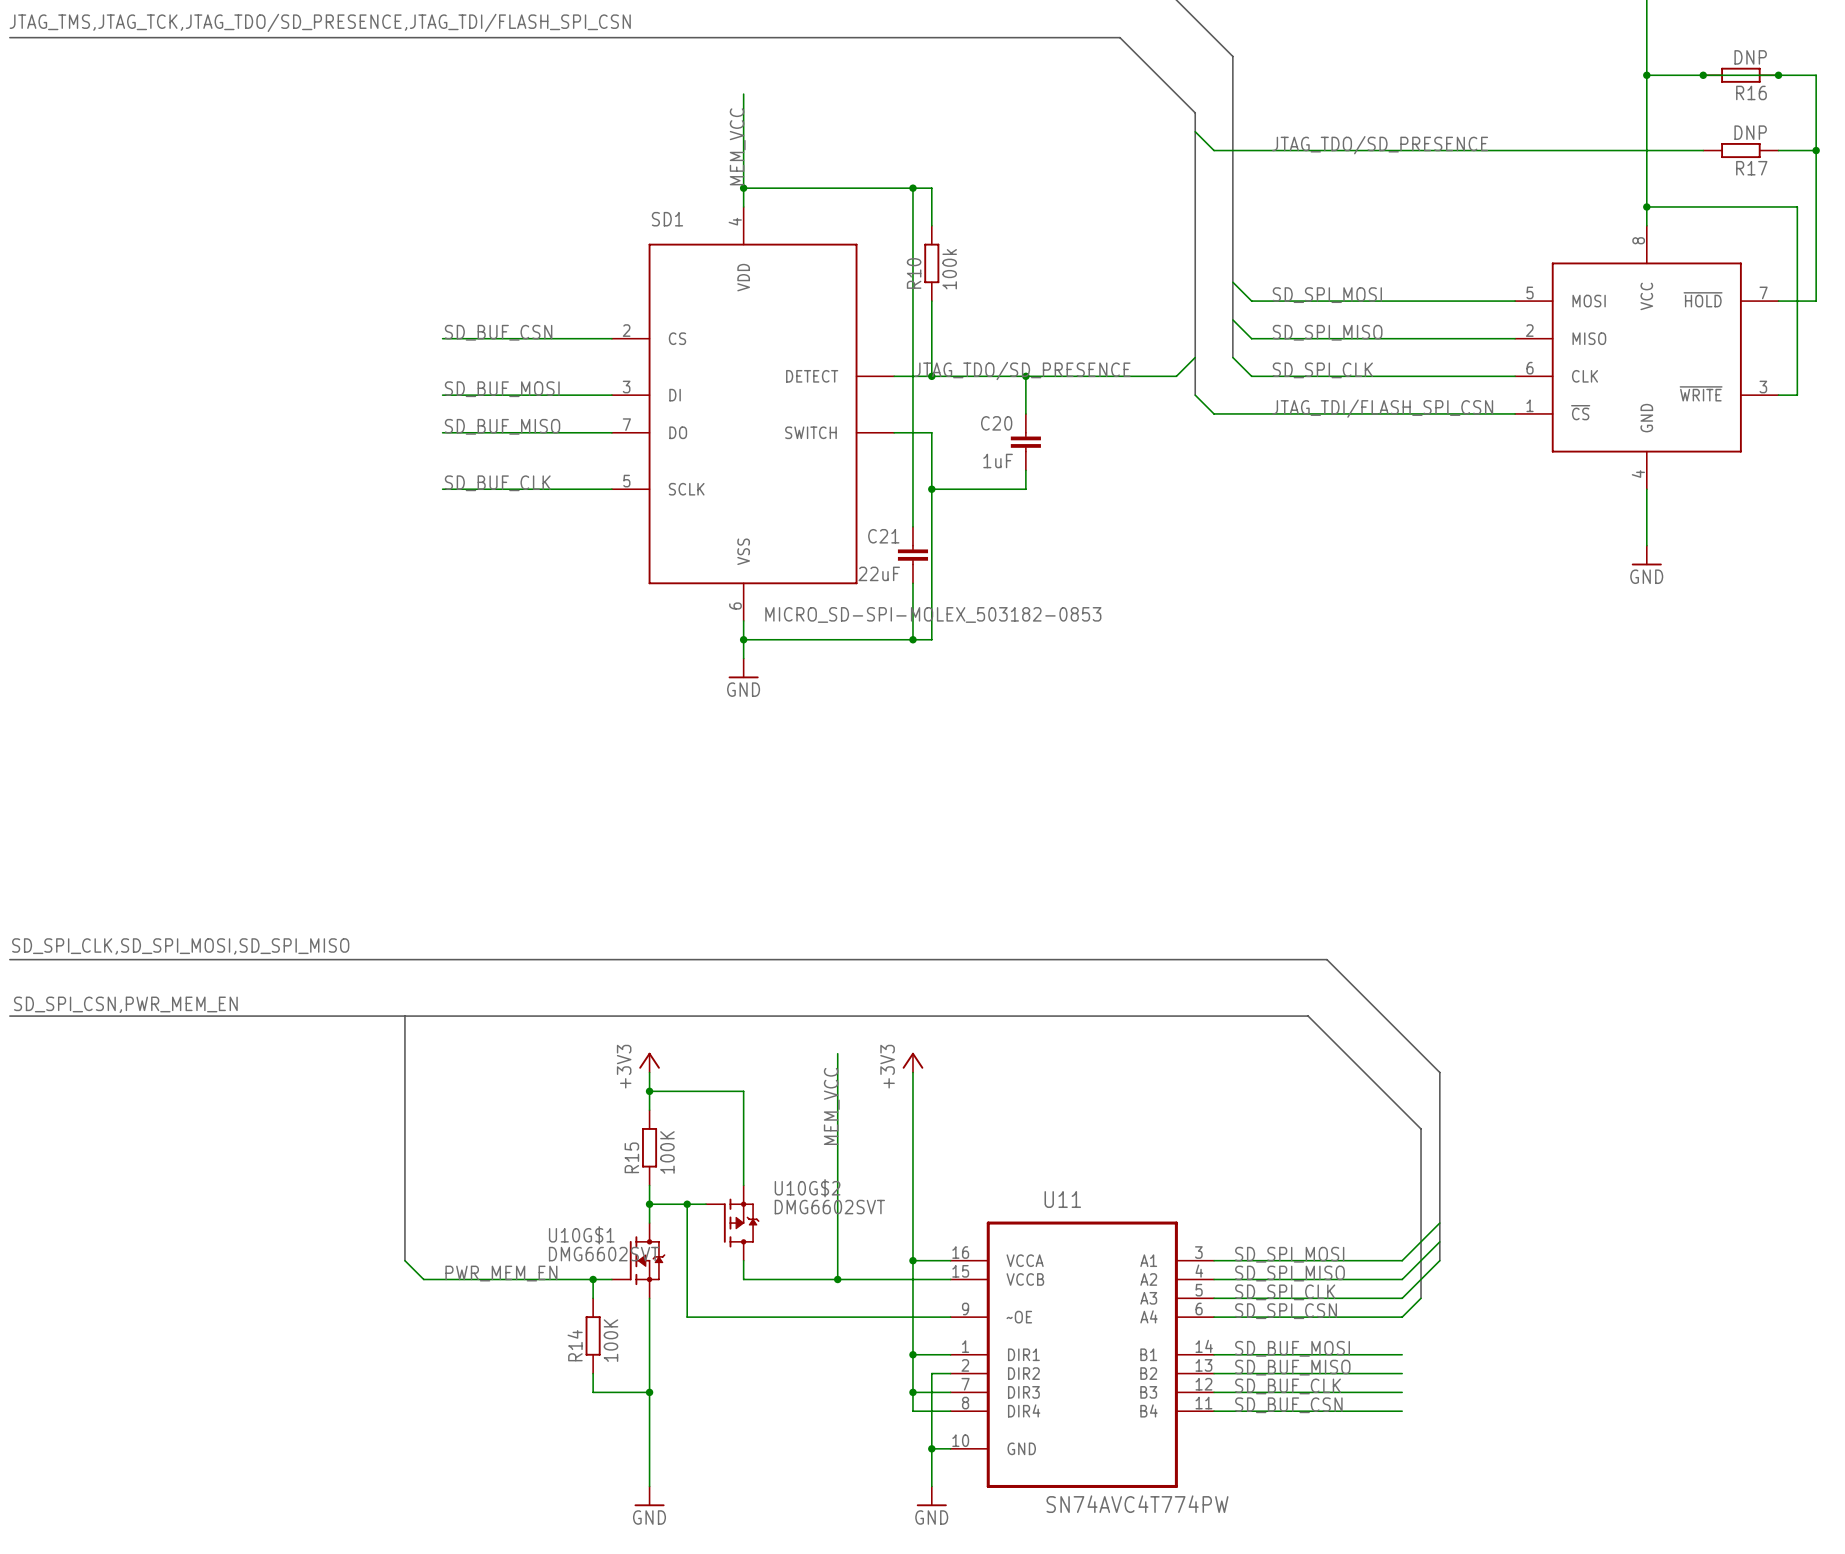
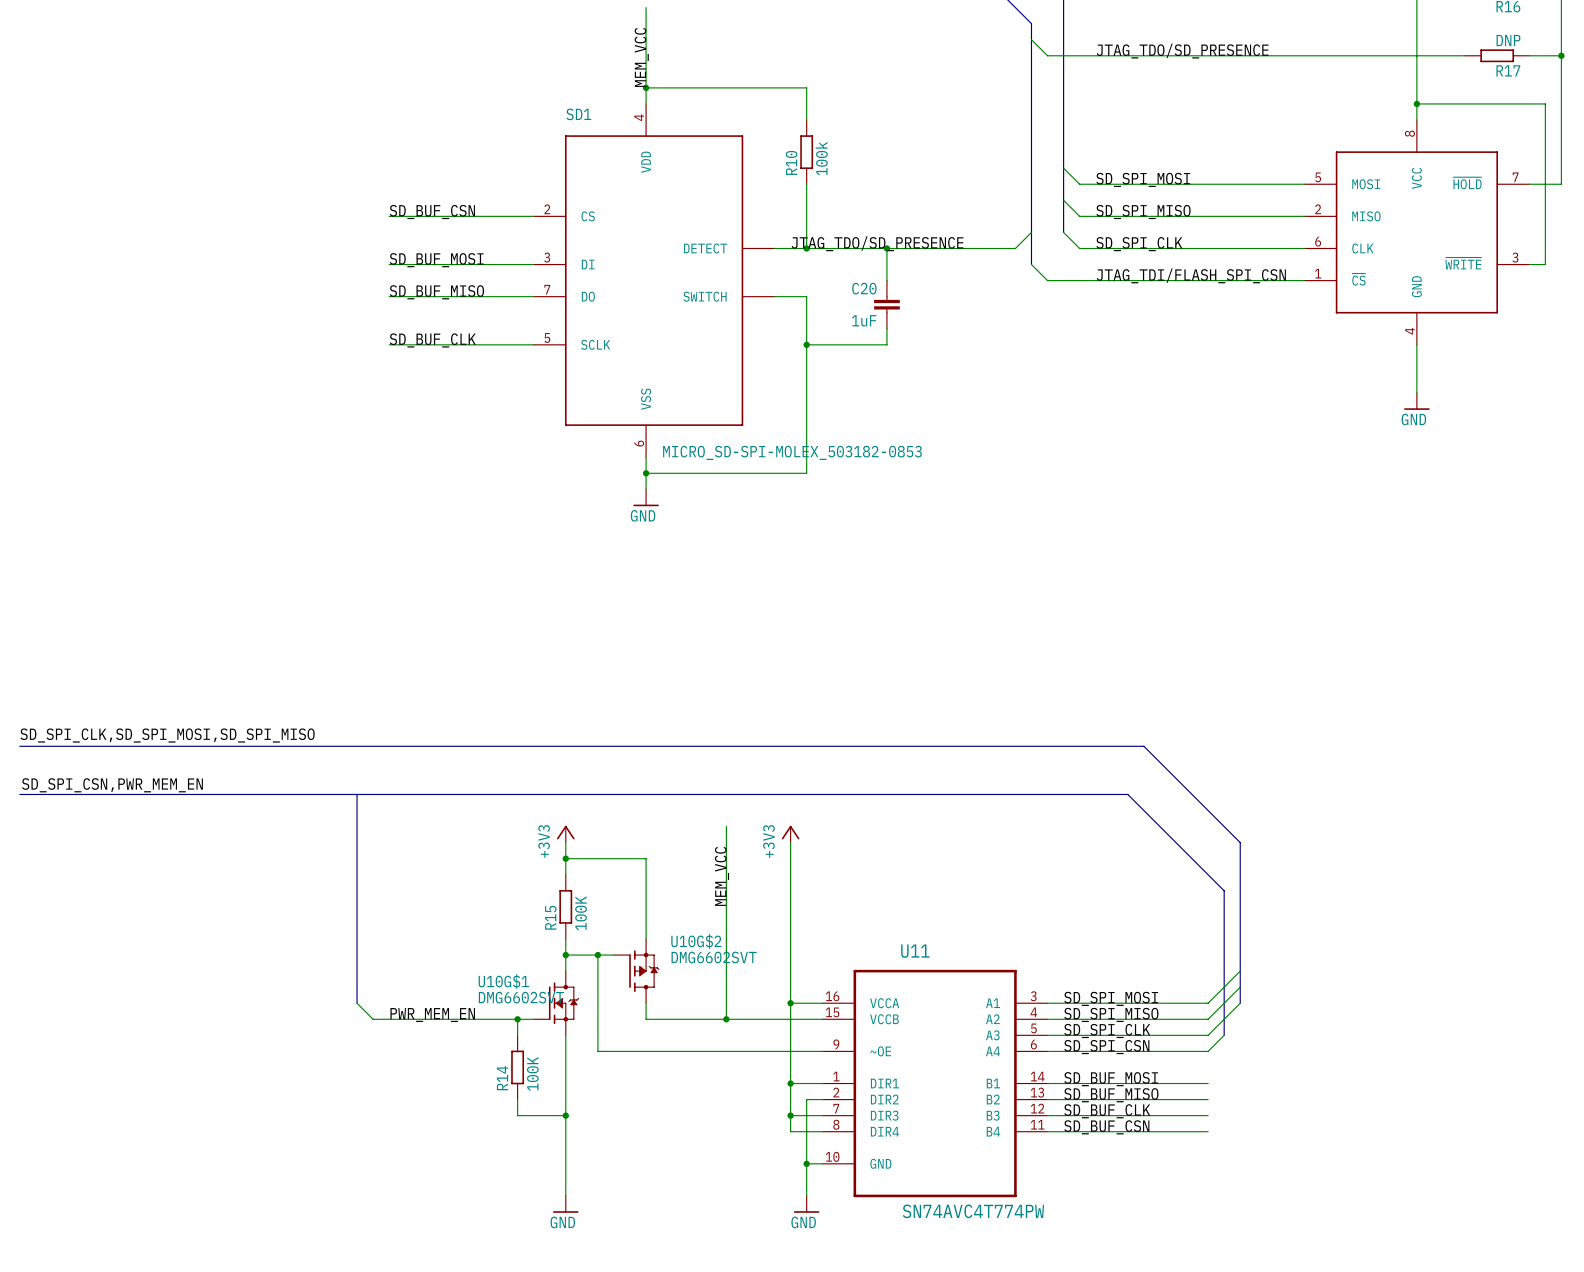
wire: (912, 188) (912, 526) -> none
junction: (912, 188) -> none
C21: 22uF (912, 555) -> none
wire: (912, 583) (912, 639) -> none
junction: (912, 639) -> none

